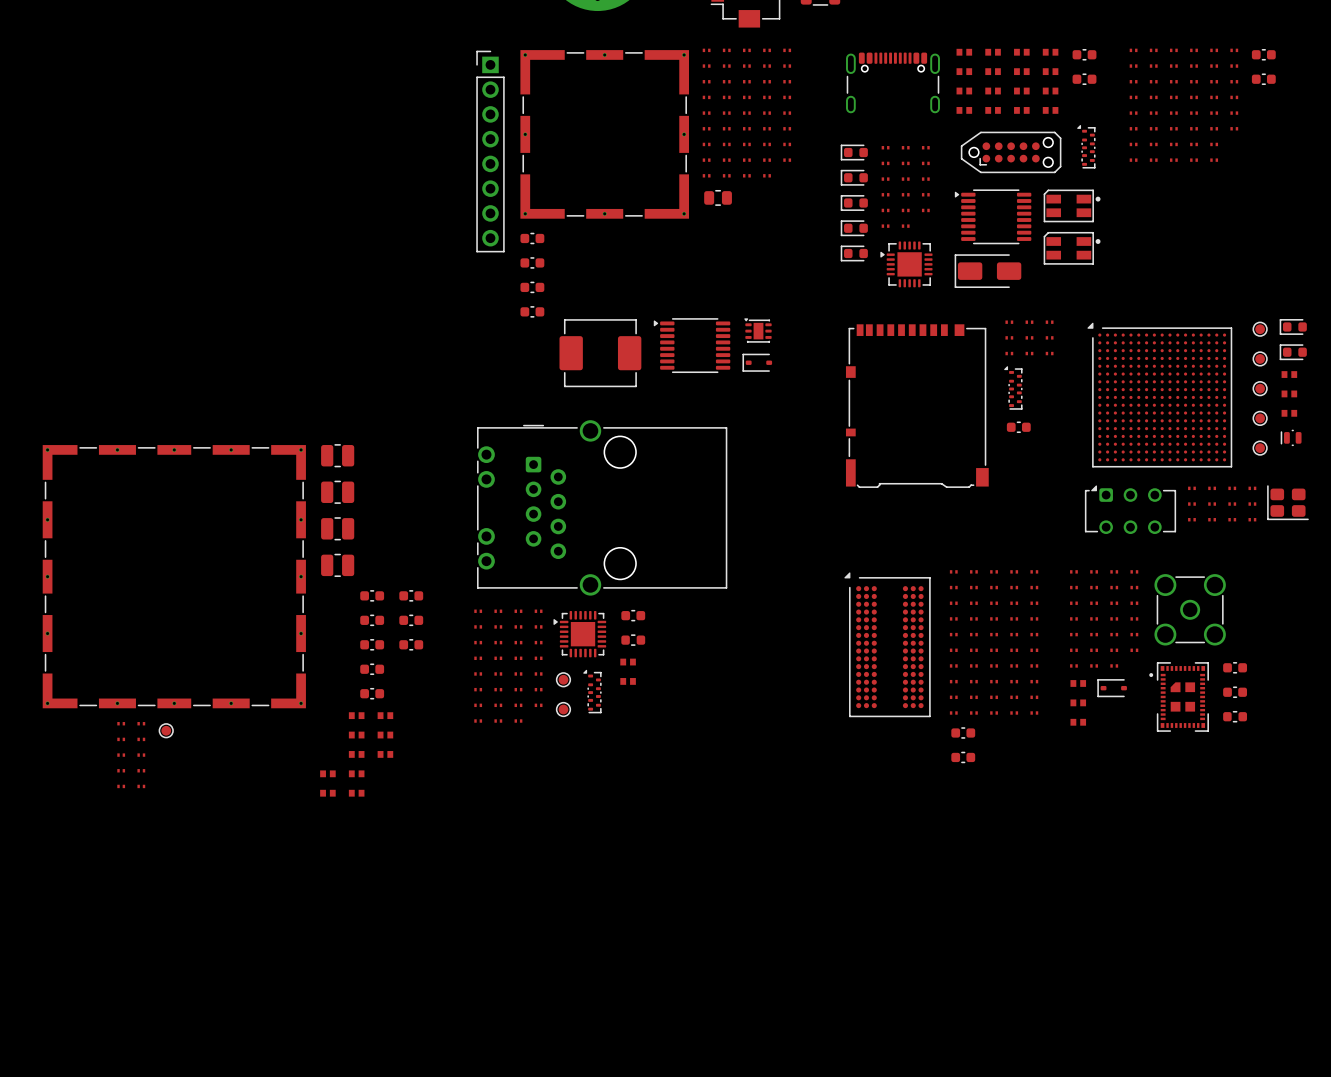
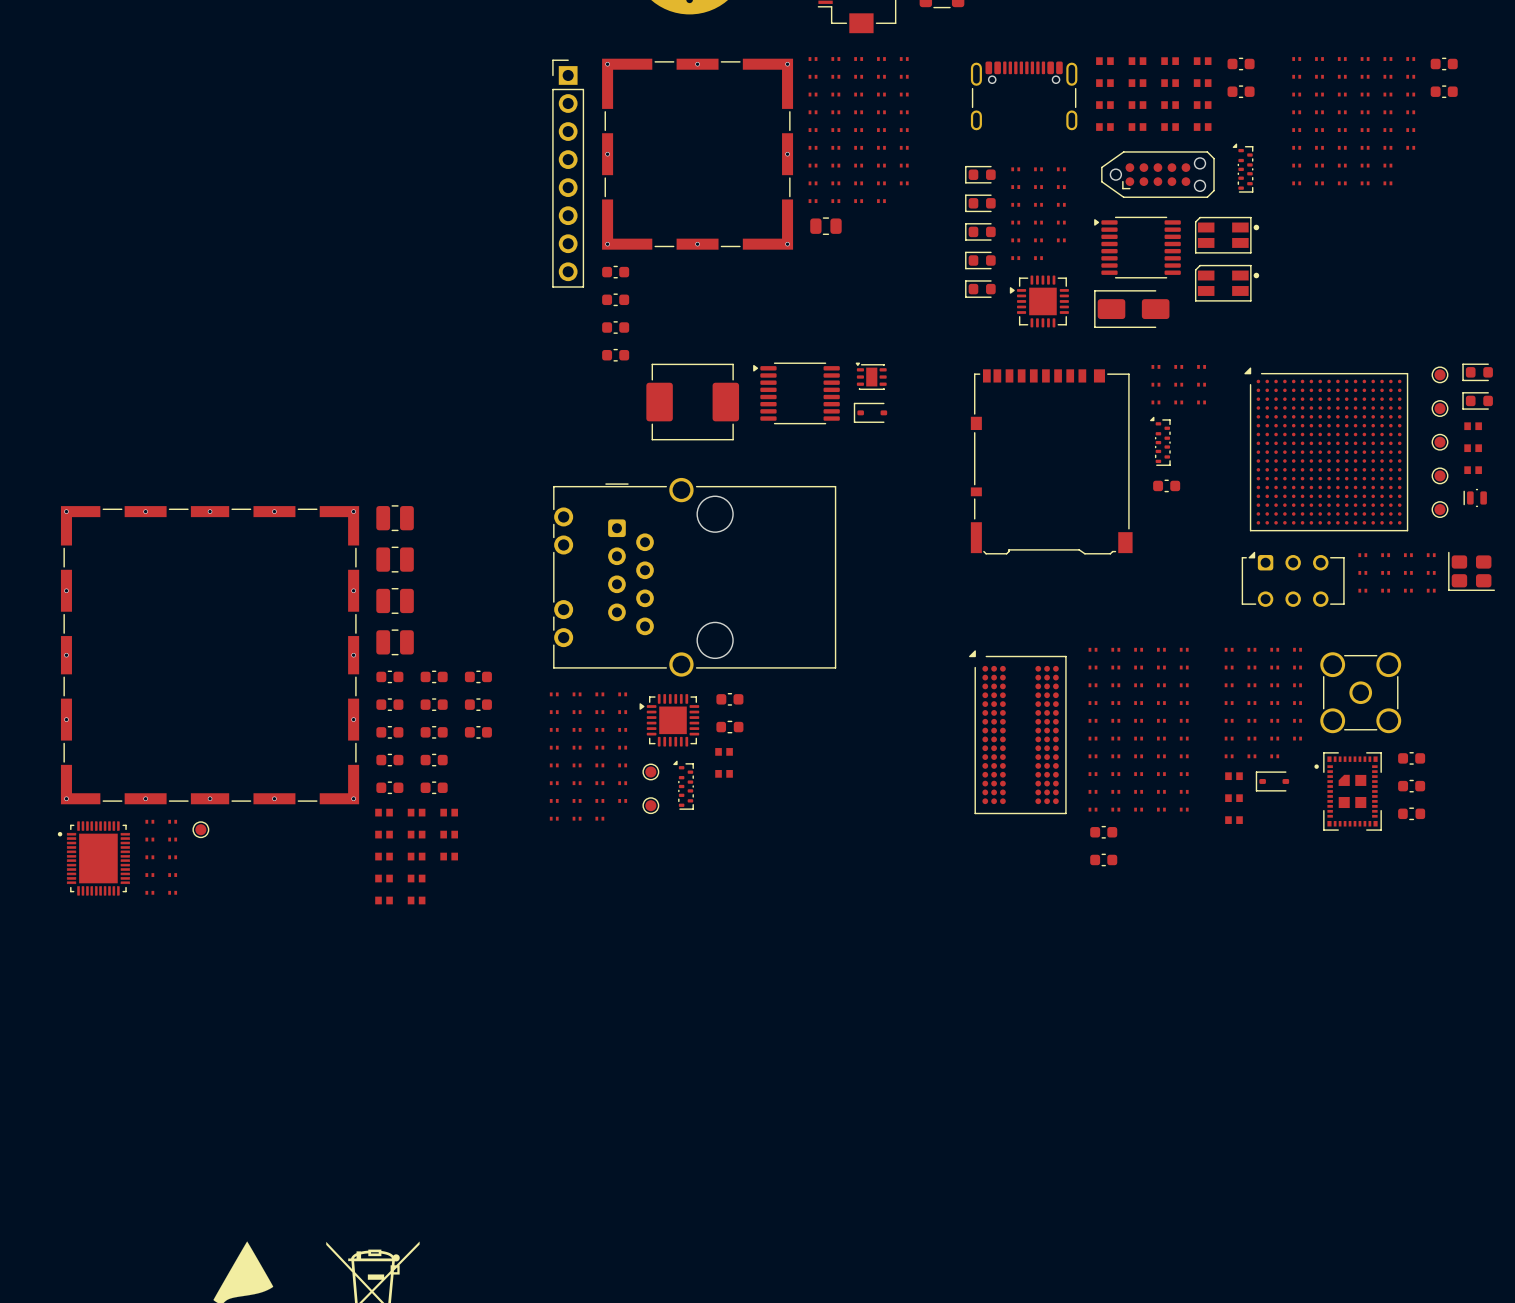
part: none -> (389, 676)
part: none -> (389, 704)
part: none -> (389, 732)
part: none -> (389, 760)
part: none -> (389, 787)
part: none -> (384, 812)
part: none -> (384, 834)
part: none -> (384, 856)
part: none -> (93, 858)

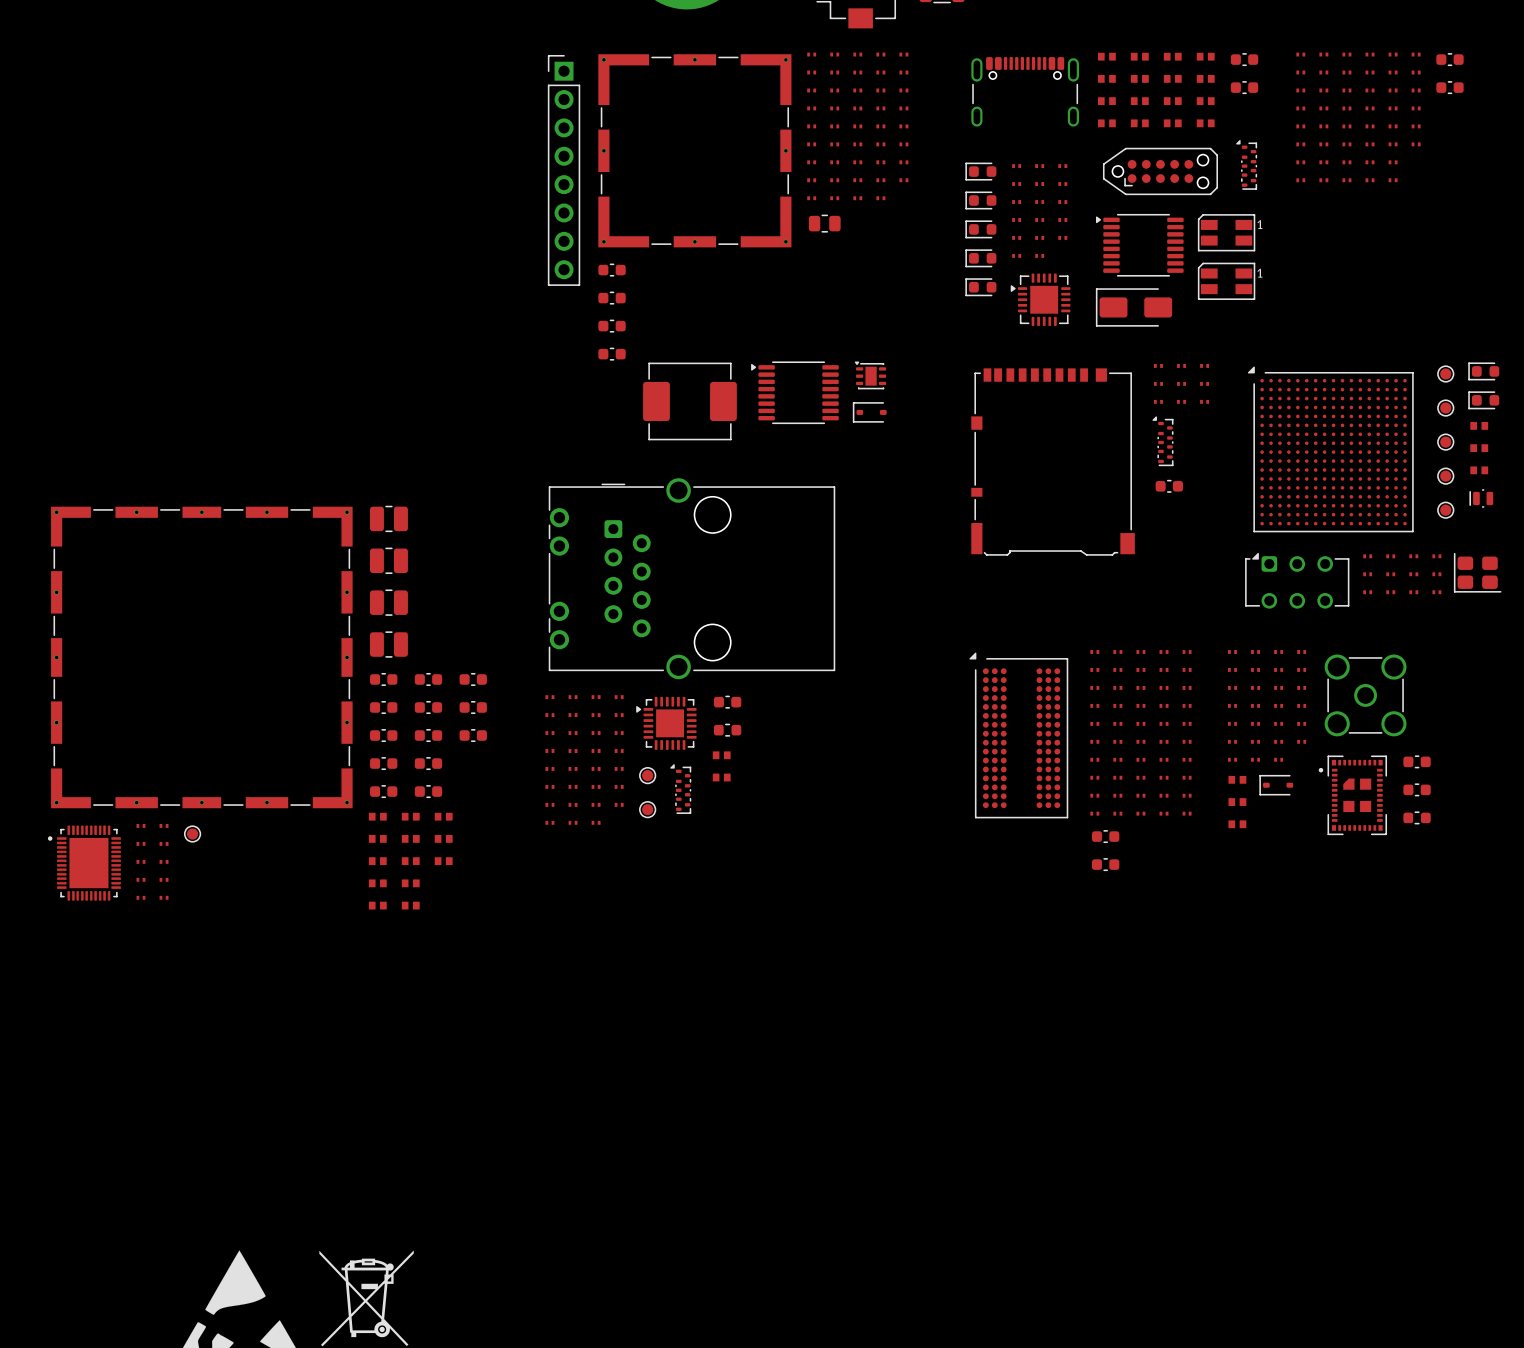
part footprint: [1195, 216, 1260, 254] -> [1197, 214, 1256, 252]
part footprint: [1195, 264, 1260, 302] -> [1197, 262, 1256, 300]

